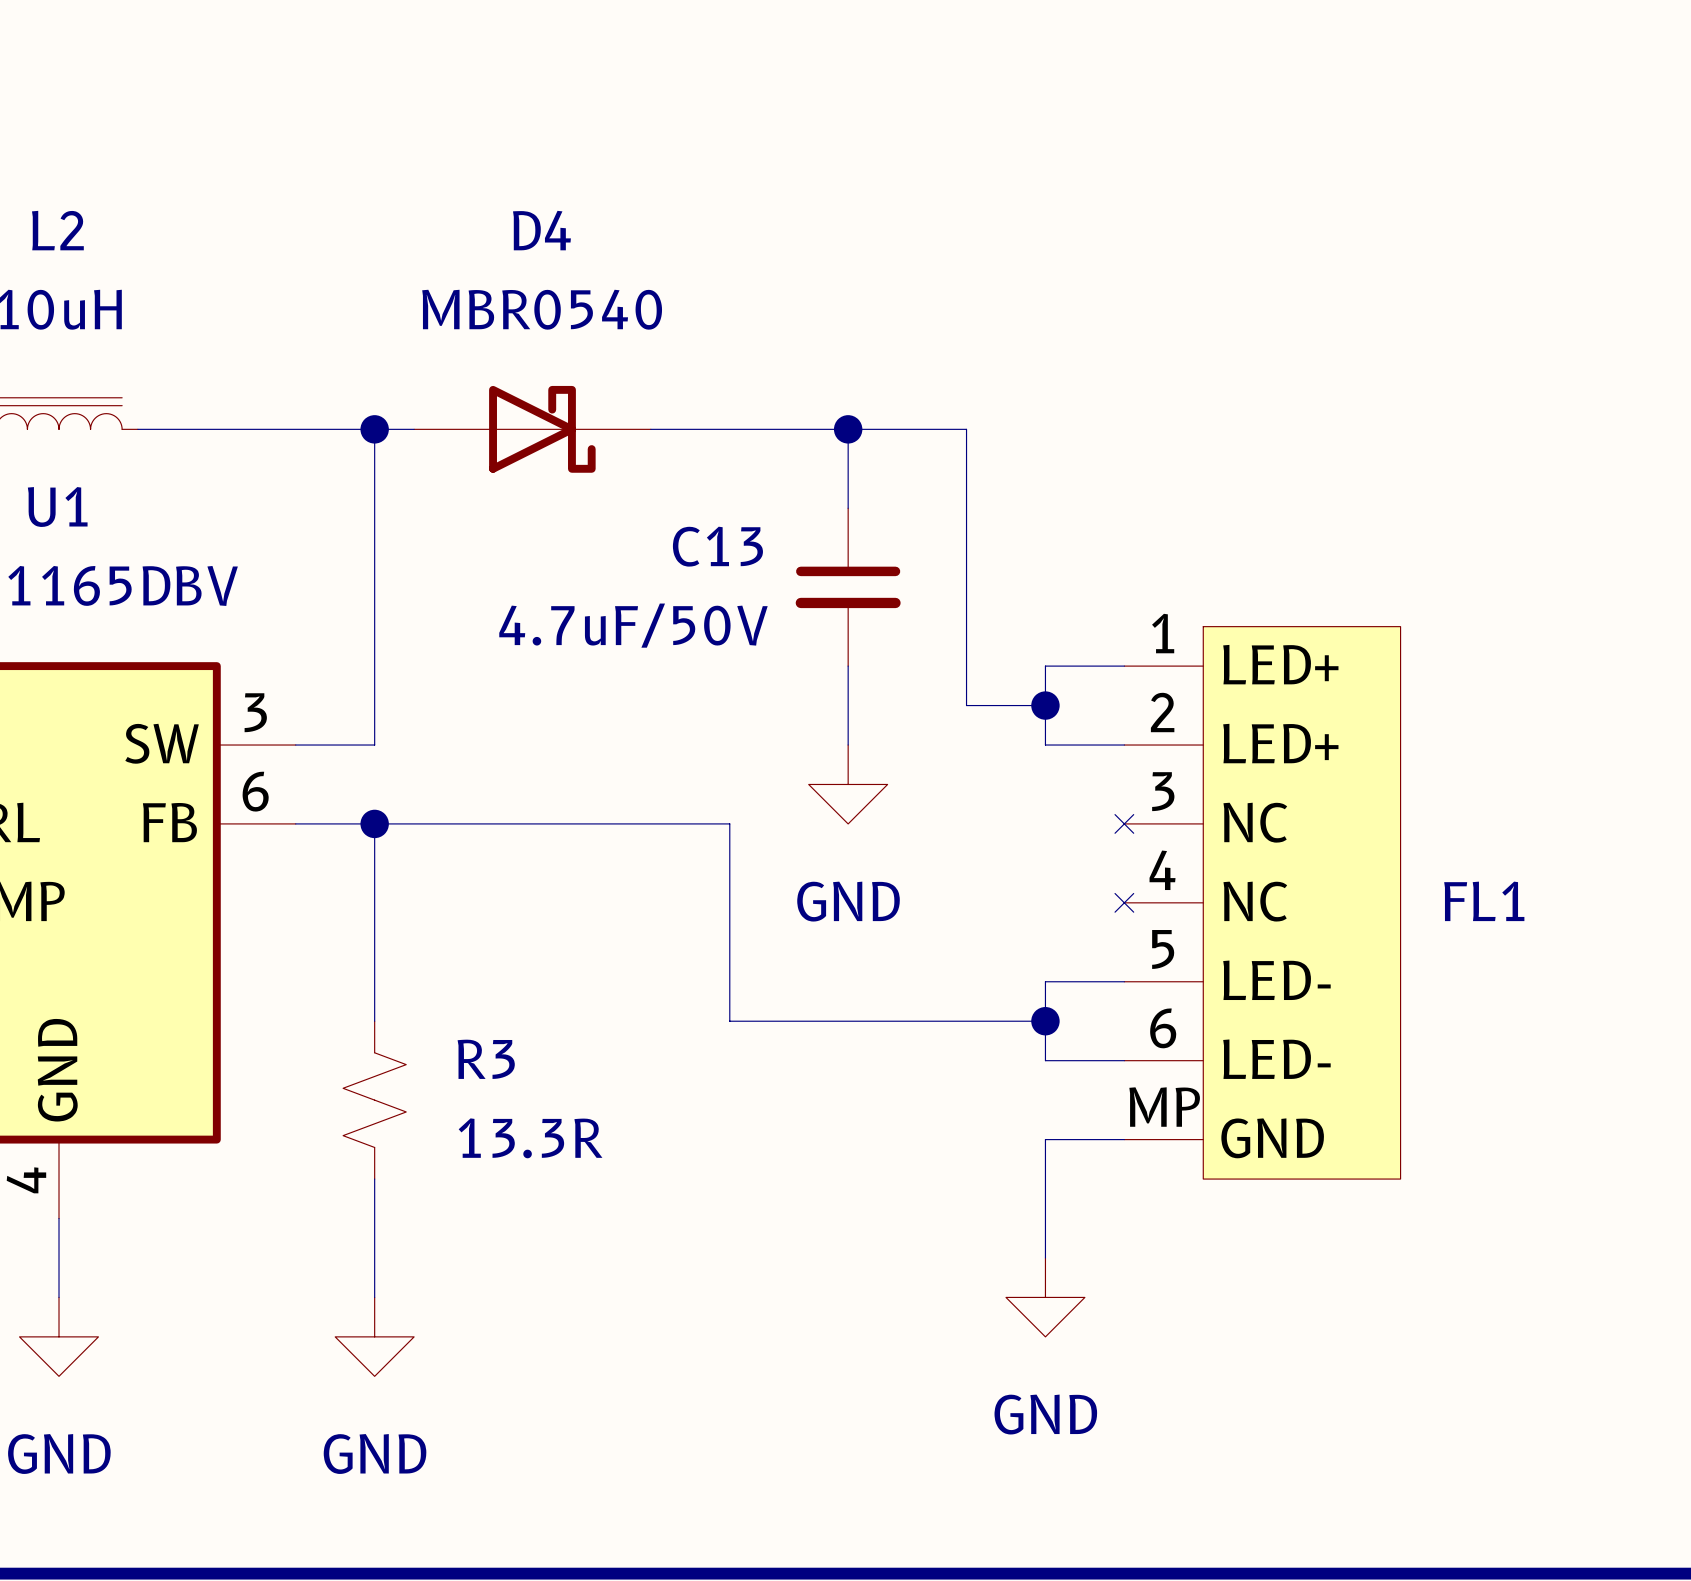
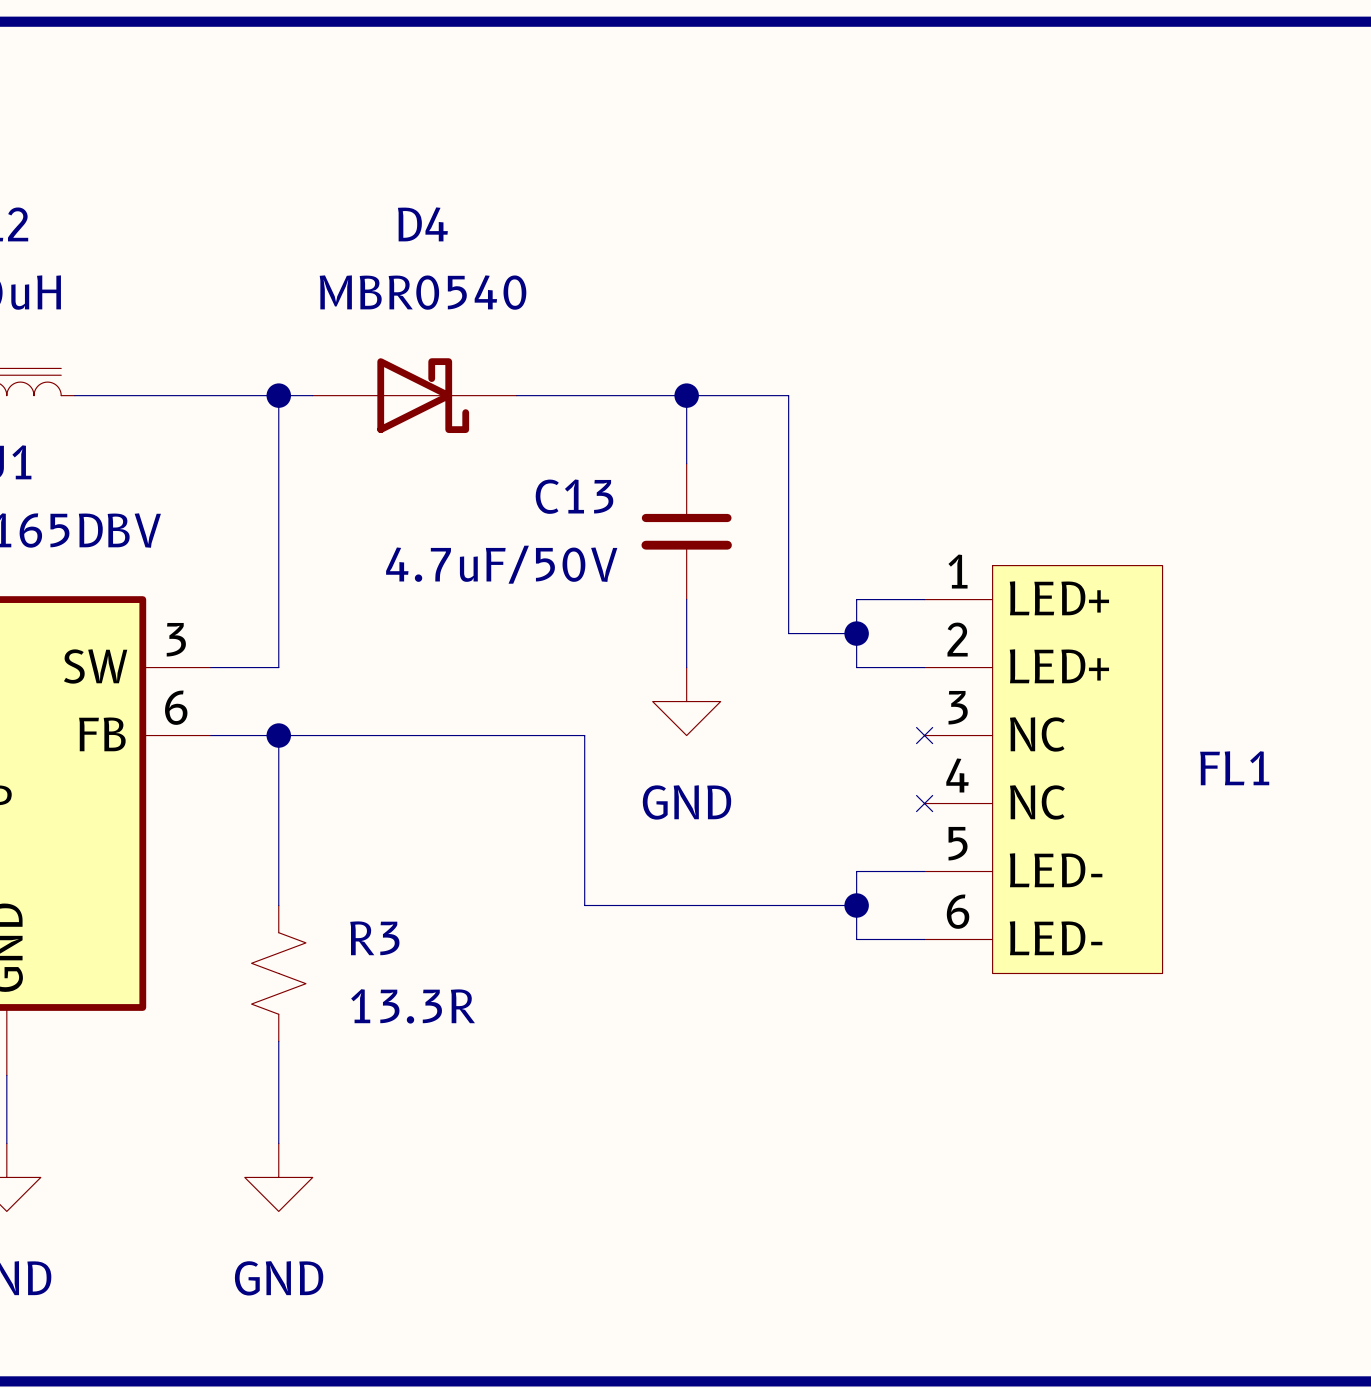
FL1 symbol: [1115, 626, 1401, 1180] -> [916, 565, 1163, 974]
wire: (1124, 1139) (1045, 1139) (1045, 1257) -> none
power symbol: GND (1045, 1297) -> none

